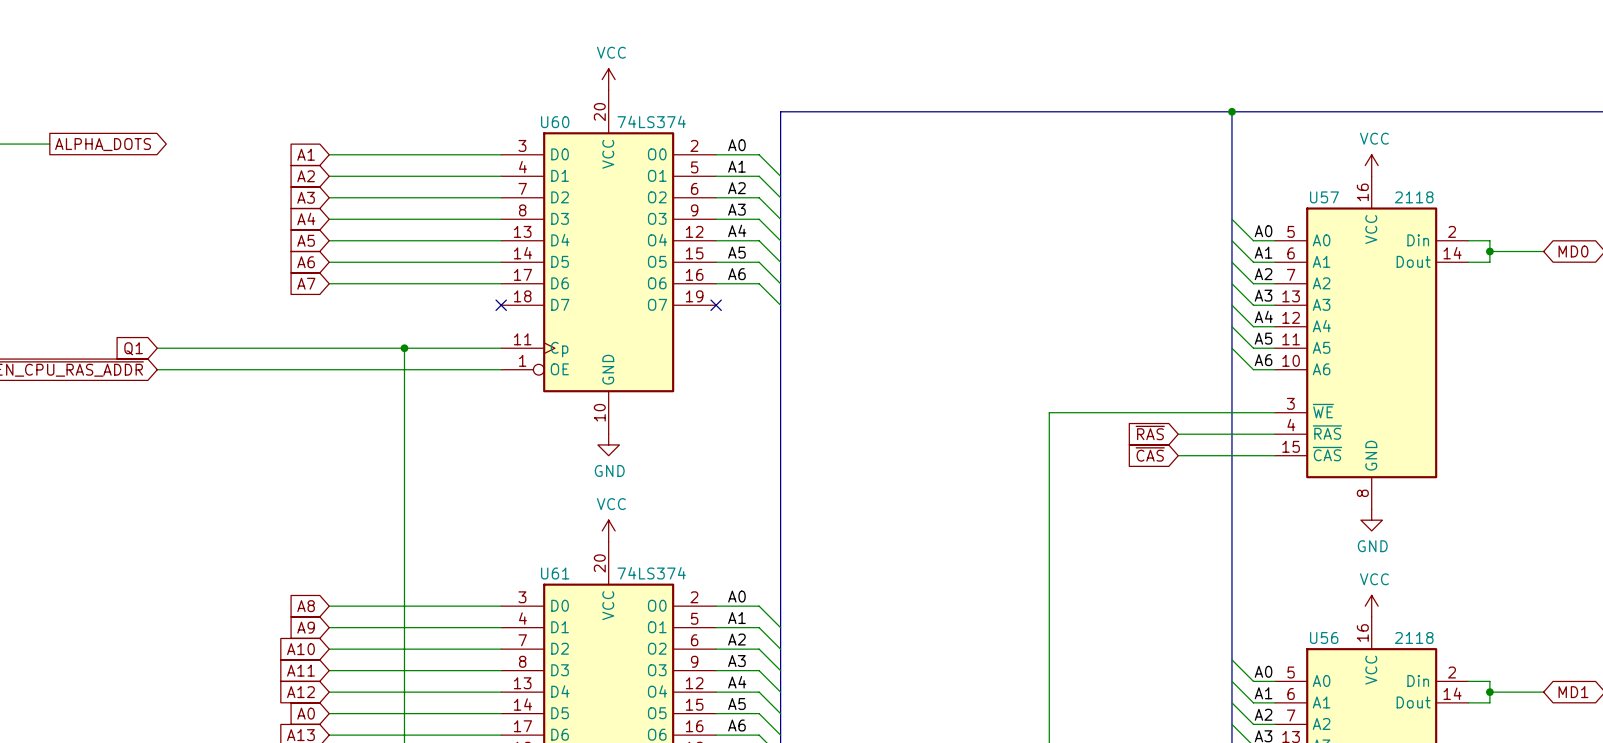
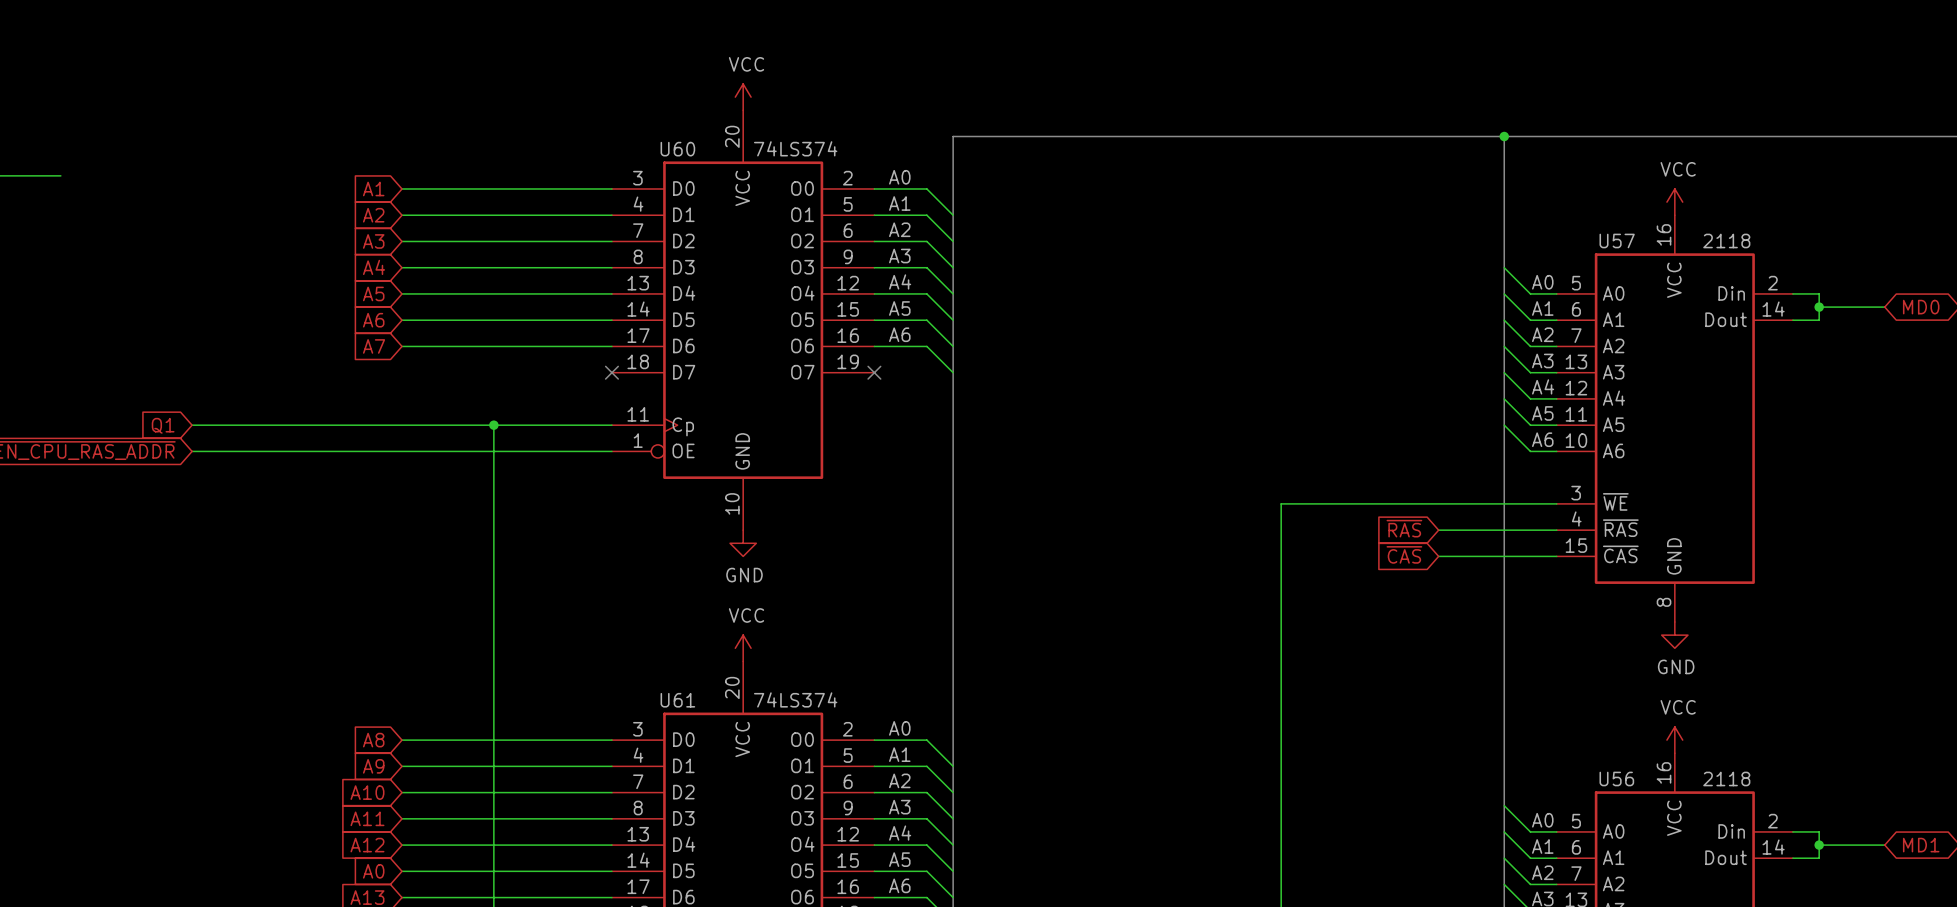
global label: ALPHA_DOTS (103, 144) -> none

